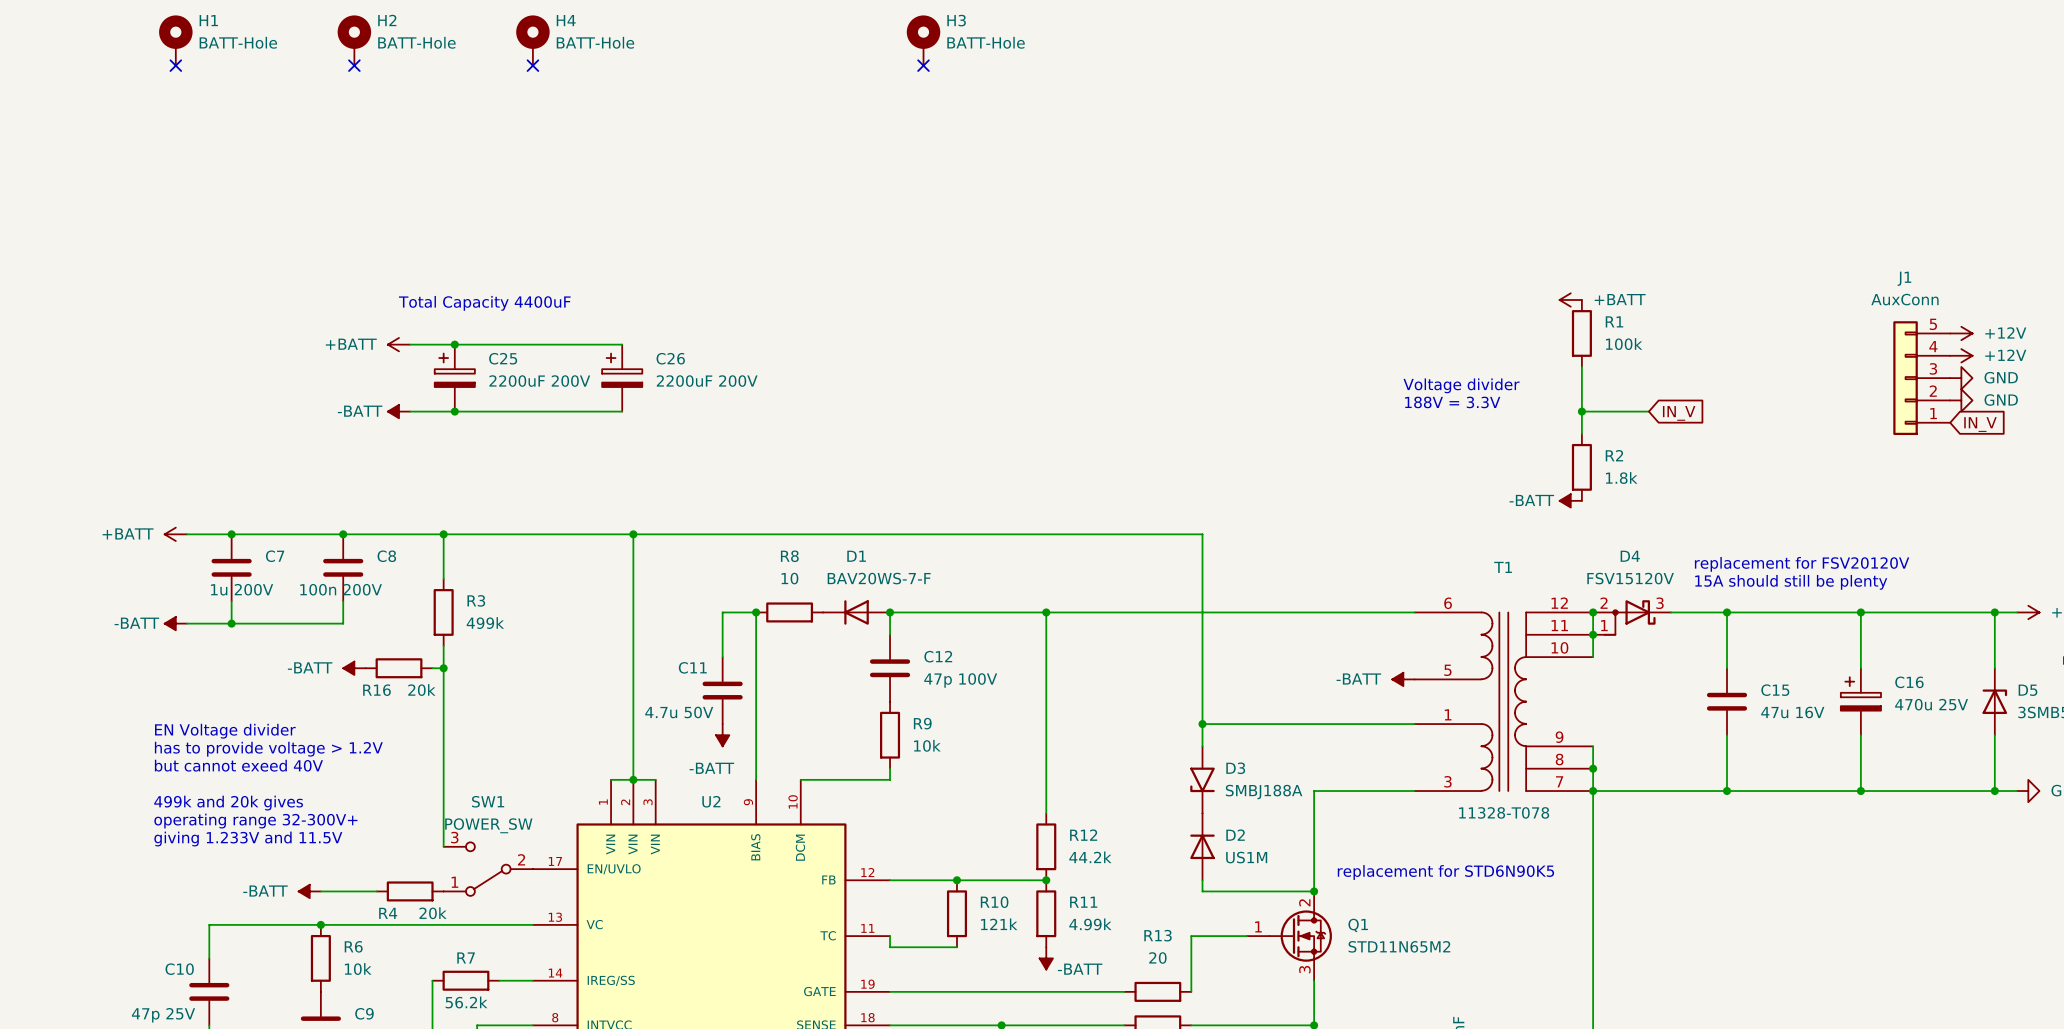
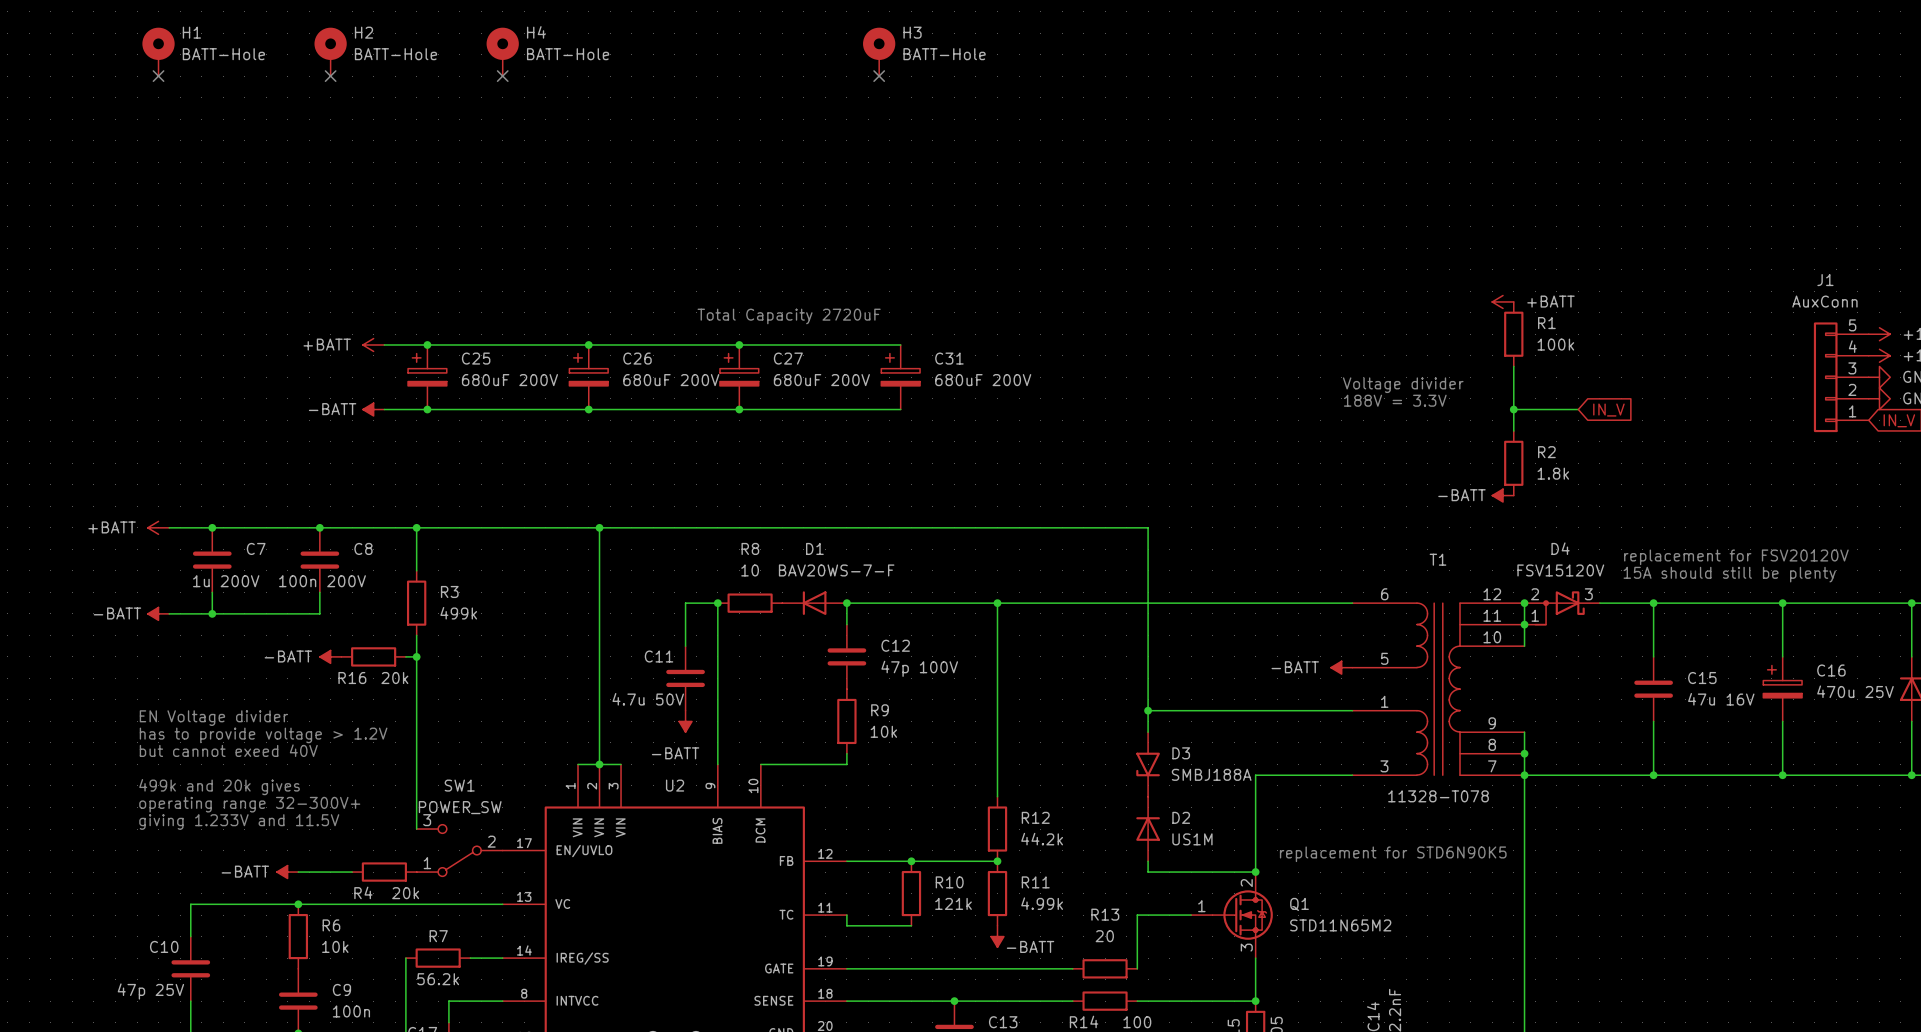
text: Total Capacity 4400uF (484, 303) -> none
text: none -> Total Capacity 2720uF (789, 316)
wire: none -> (588, 344) (900, 344)
junction: none -> (588, 344)
junction: none -> (739, 344)
C27: none -> 680uF 200V (739, 377)
C31: none -> 680uF 200V (900, 377)
C25 value: 2200uF 200V (539, 381) -> 680uF 200V (509, 380)
C26 value: 2200uF 200V (707, 381) -> 680uF 200V (671, 380)
wire: none -> (588, 409) (900, 409)
junction: none -> (588, 409)
junction: none -> (739, 409)

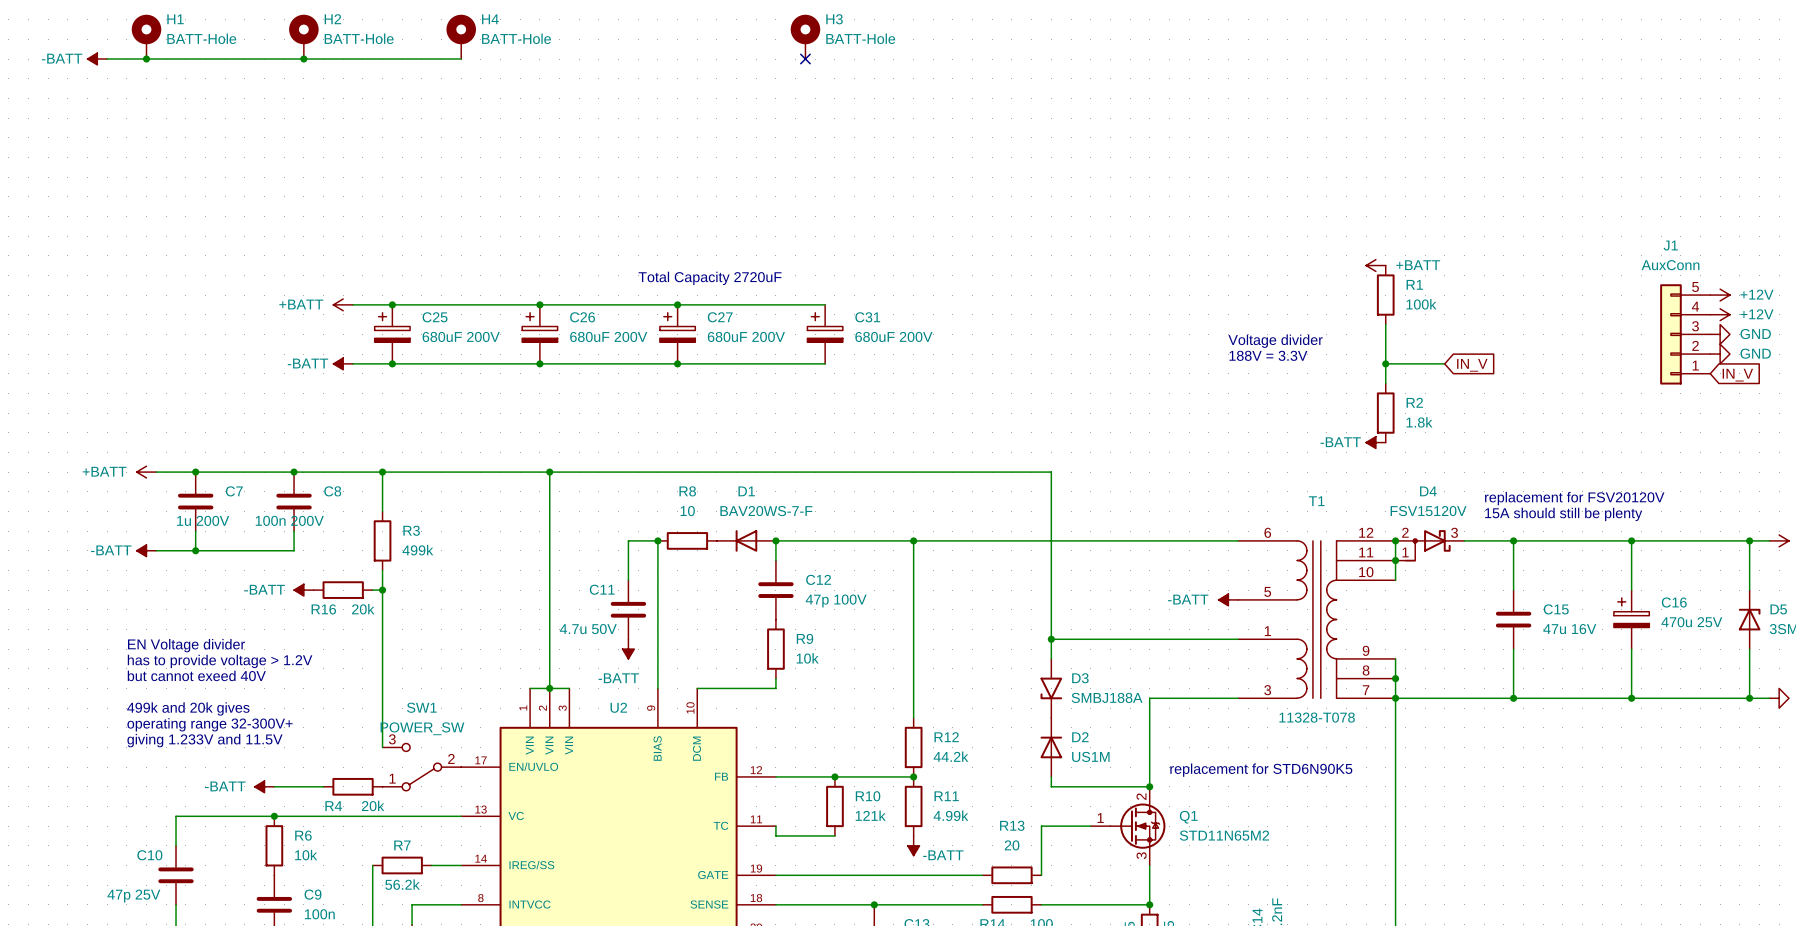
power symbol: none -> -BATT (97, 59)
wire: none -> (107, 59) (461, 59)
no-connect mark: (158, 76) -> none
junction: none -> (146, 59)
no-connect mark: (330, 76) -> none
junction: none -> (303, 59)
no-connect mark: (502, 76) -> none

